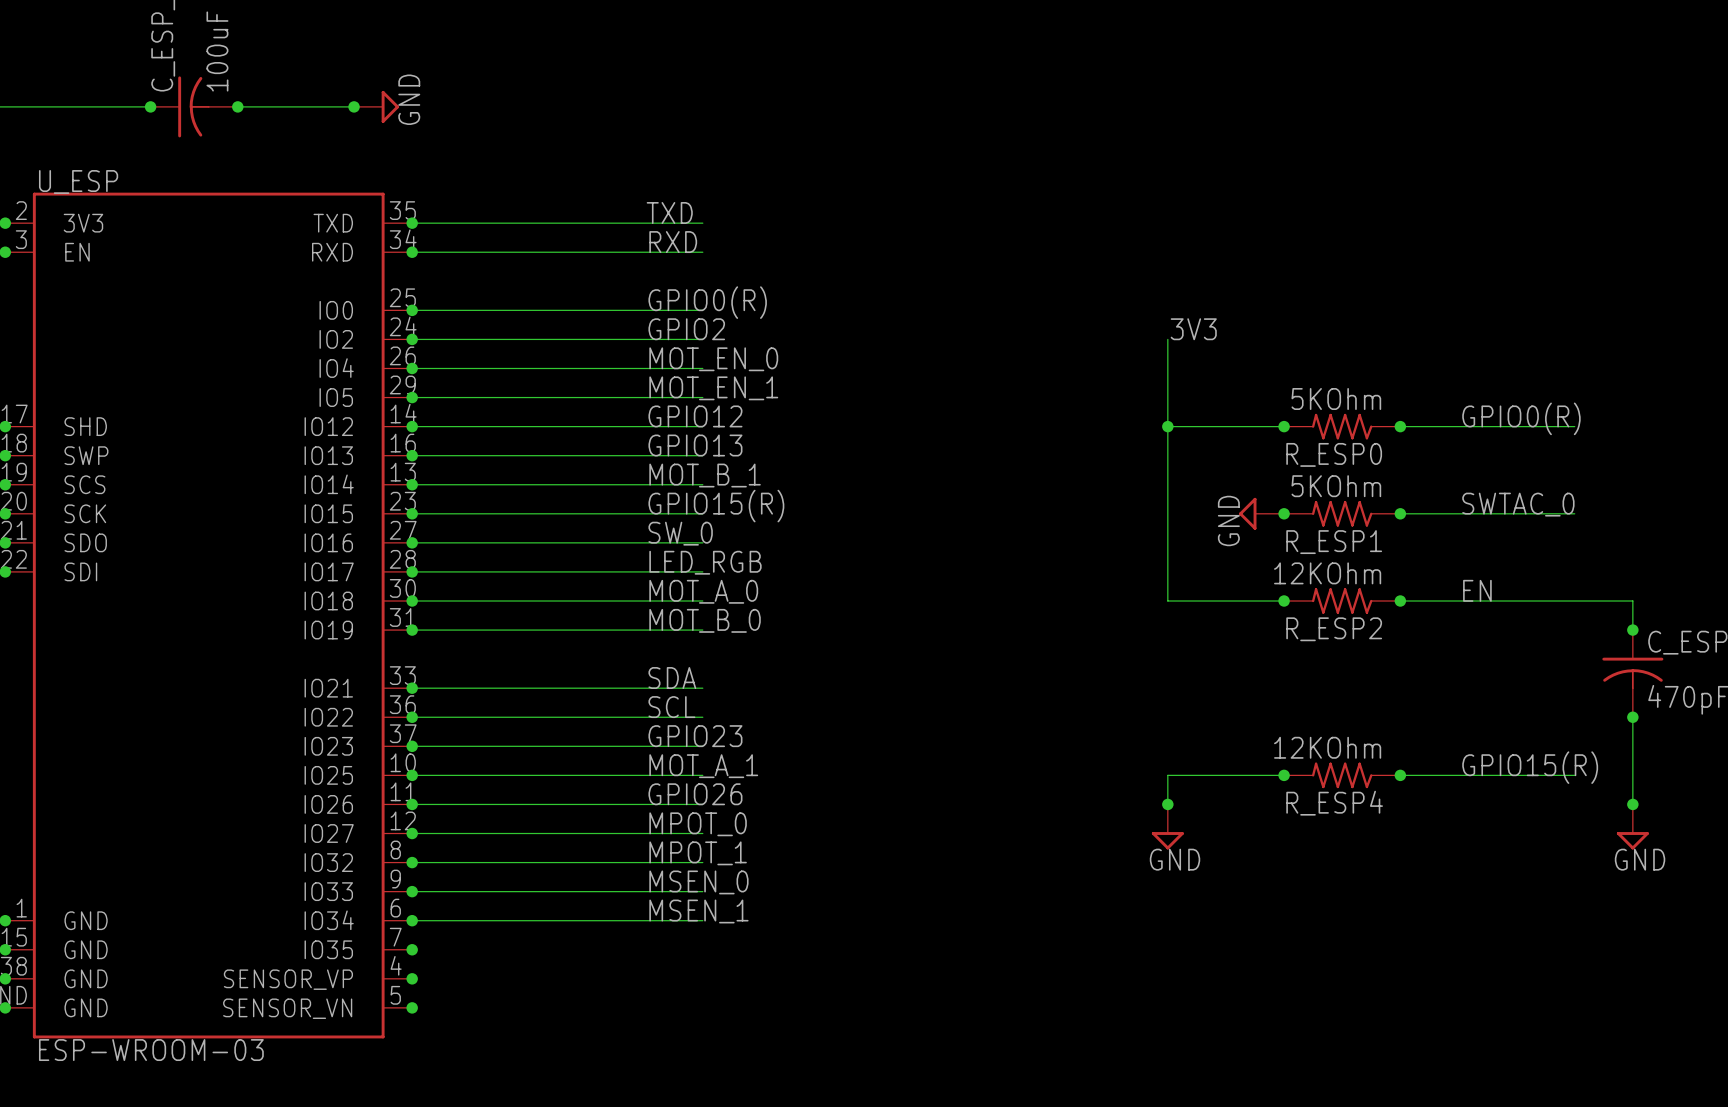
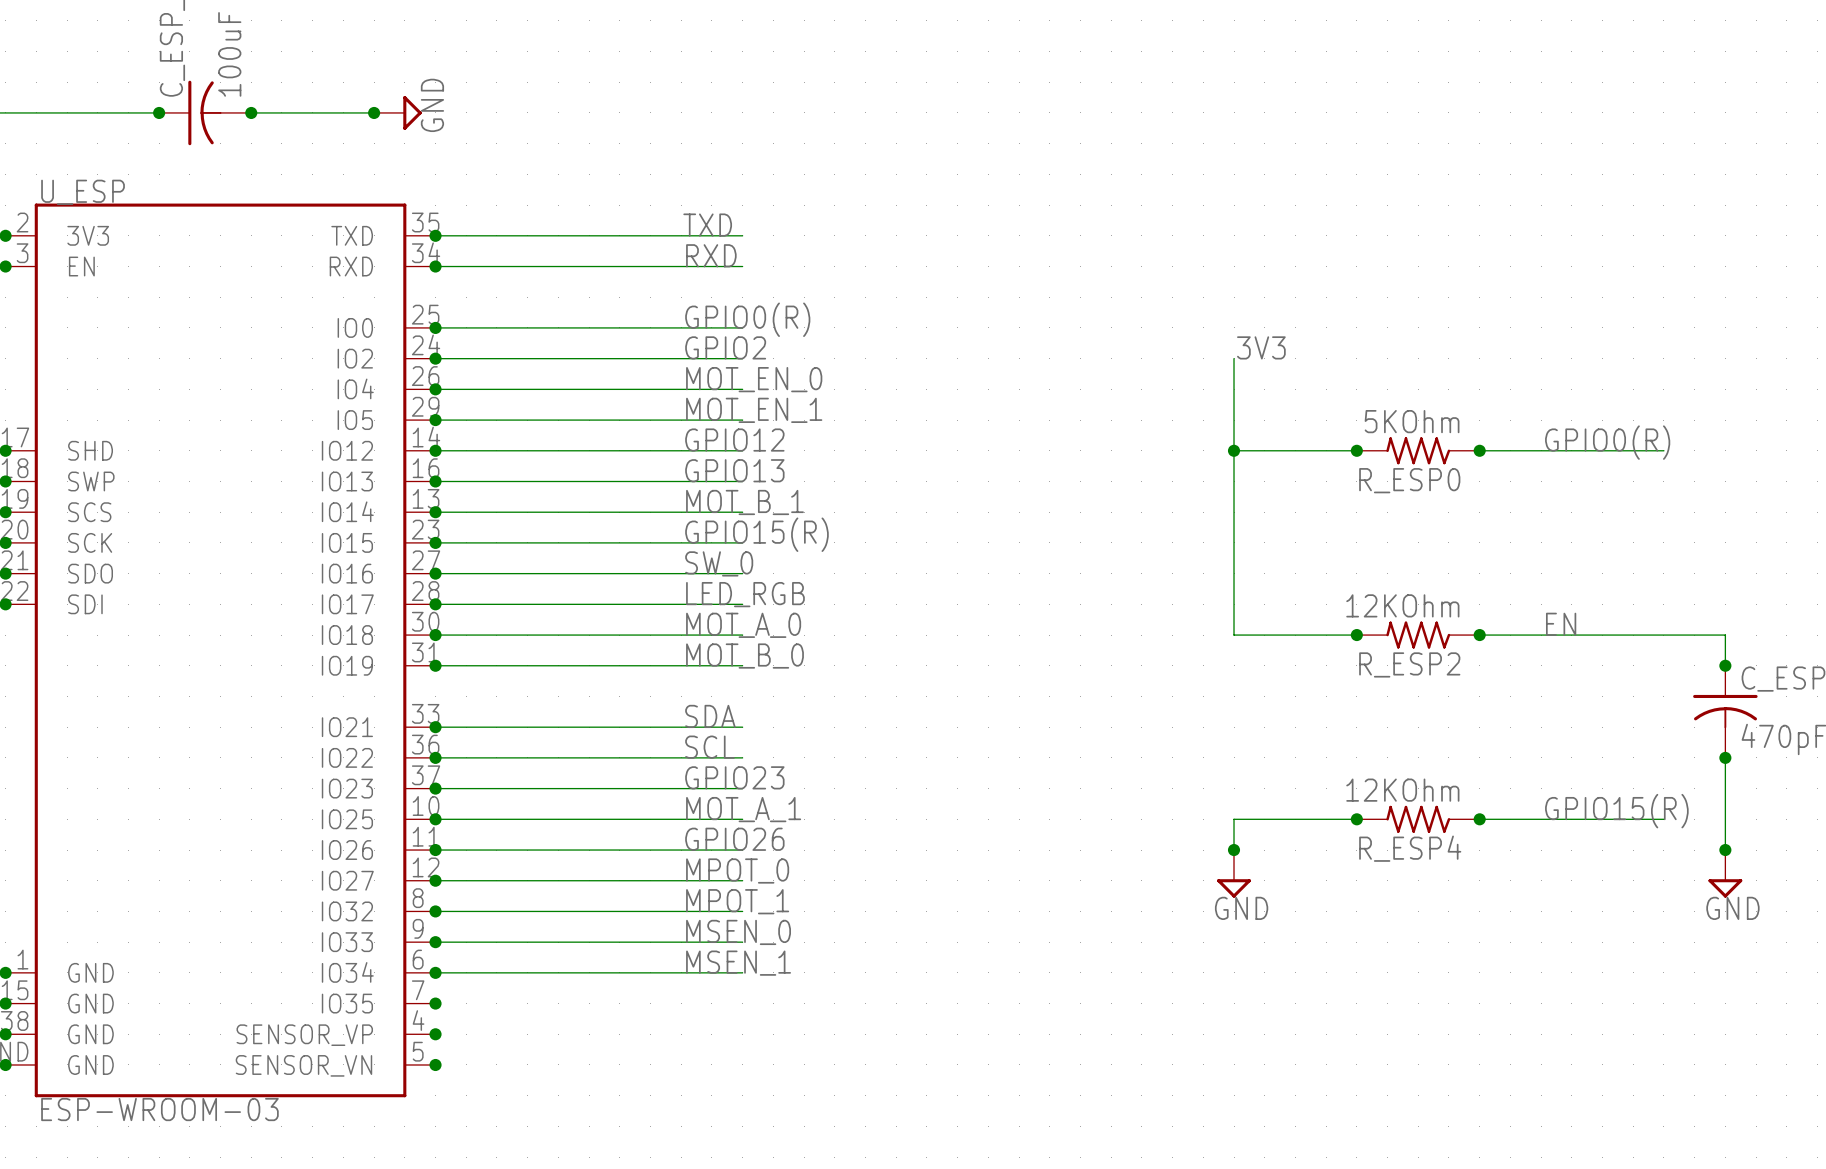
label: SWTAC_0 (1518, 504) -> none
power symbol: GND (1261, 513) -> none
junction: (1284, 513) -> none
R_ESP1: 5KOhm (1342, 513) -> none
wire: (1400, 513) (1574, 513) -> none
junction: (1400, 513) -> none

